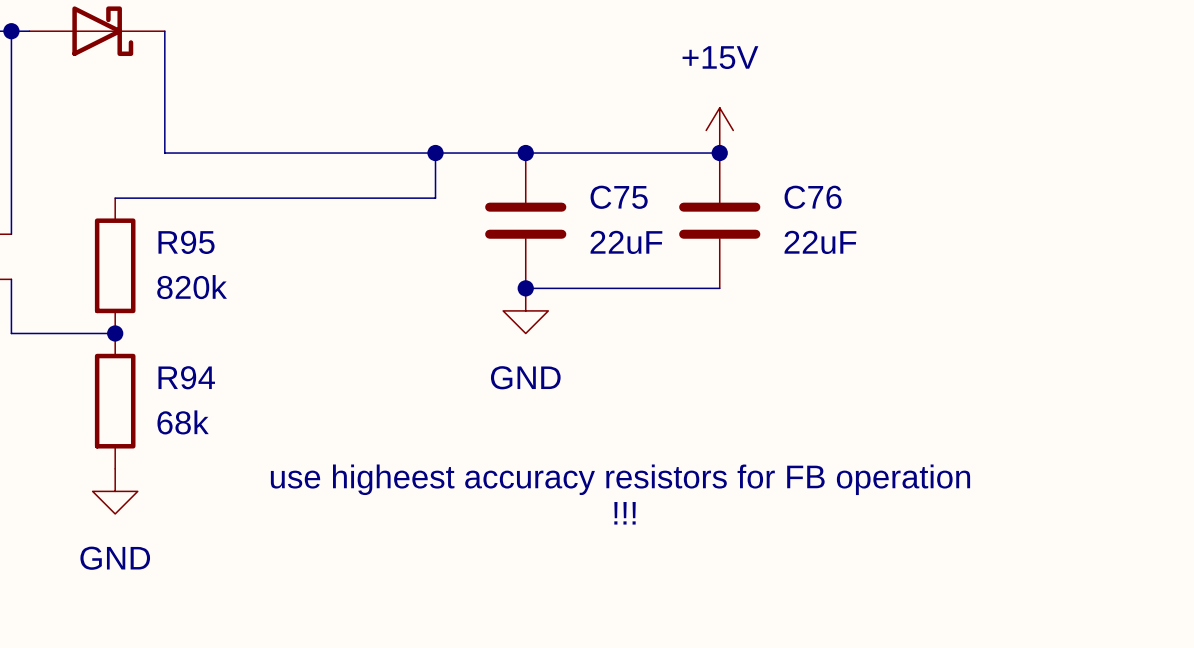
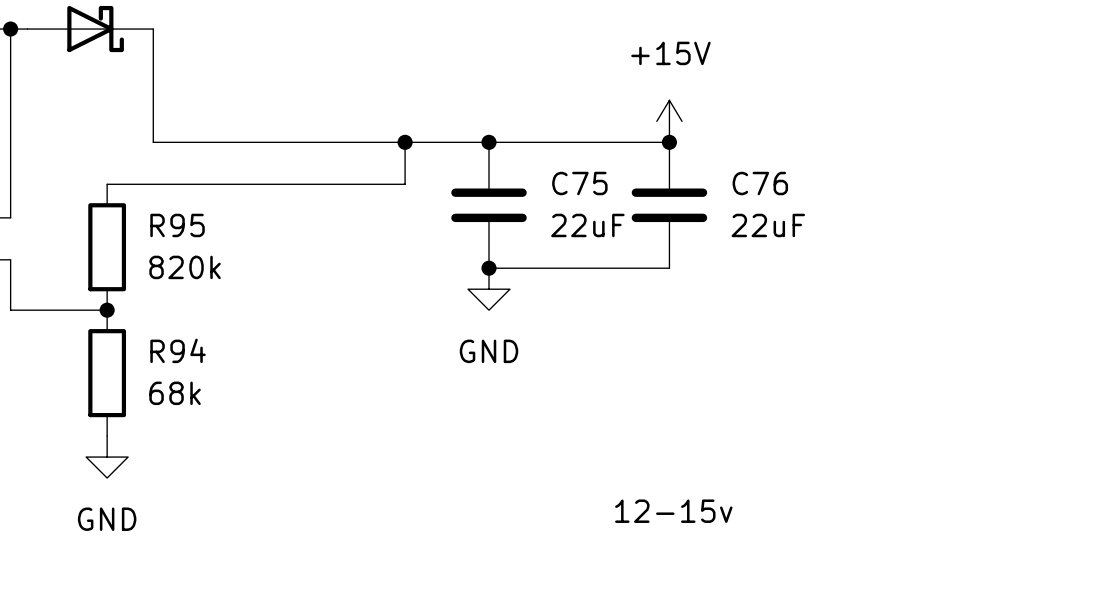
text: use higheest accuracy resistors for FB operation (620, 479) -> none
text: !!! (625, 513) -> none
text: none -> 12-15v (673, 511)

